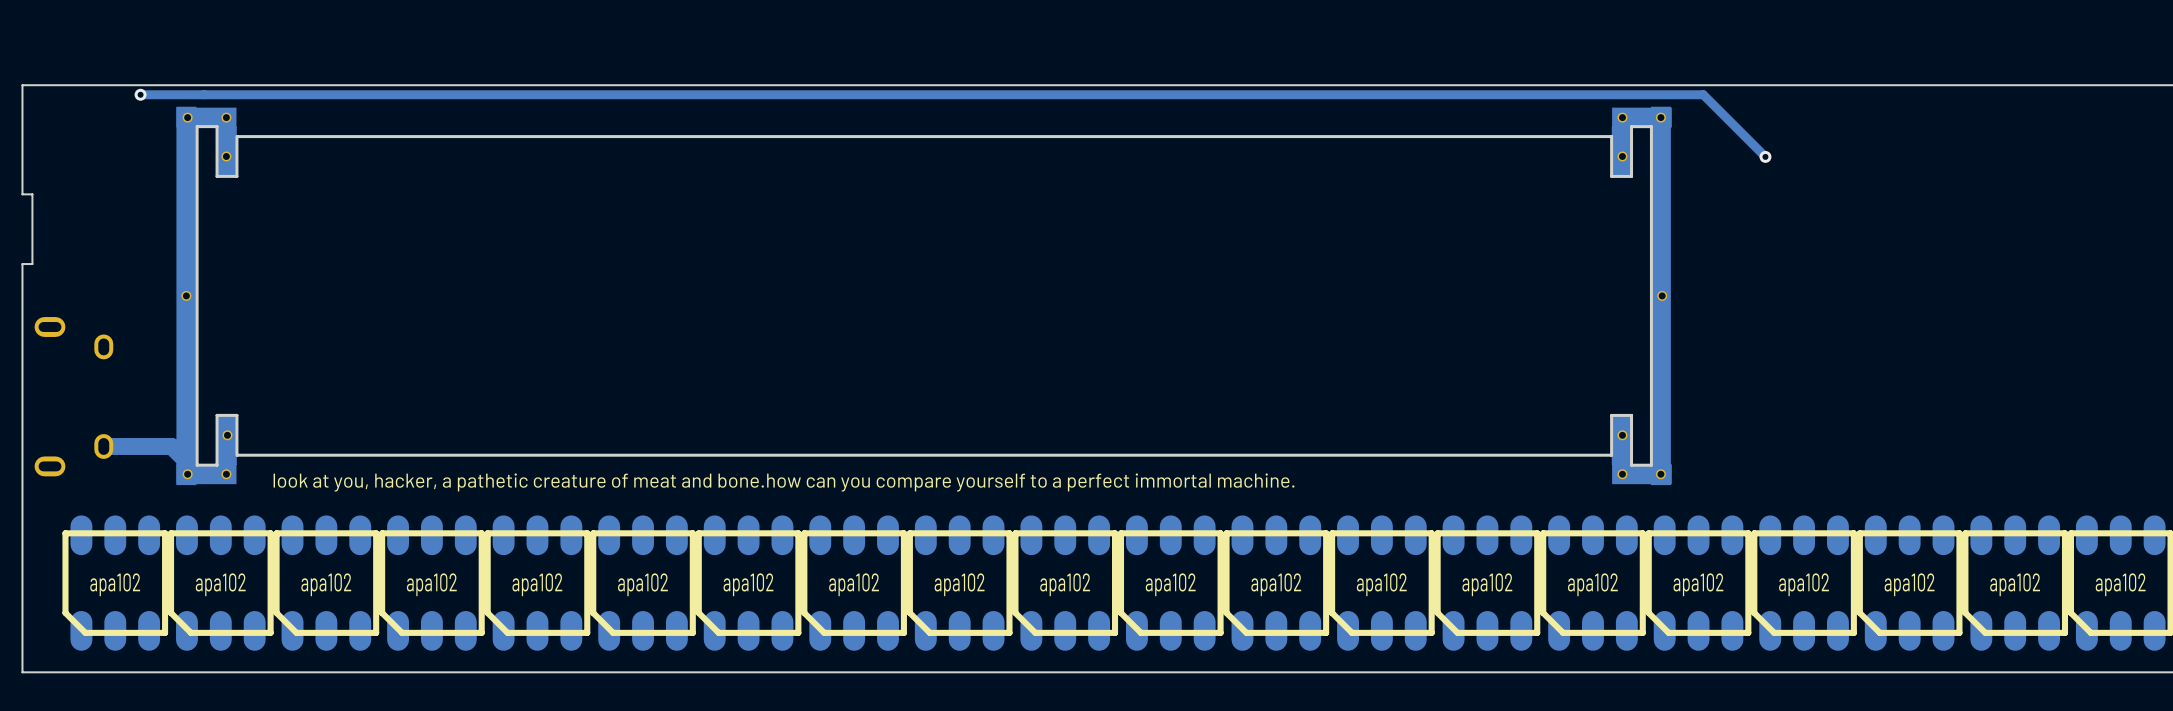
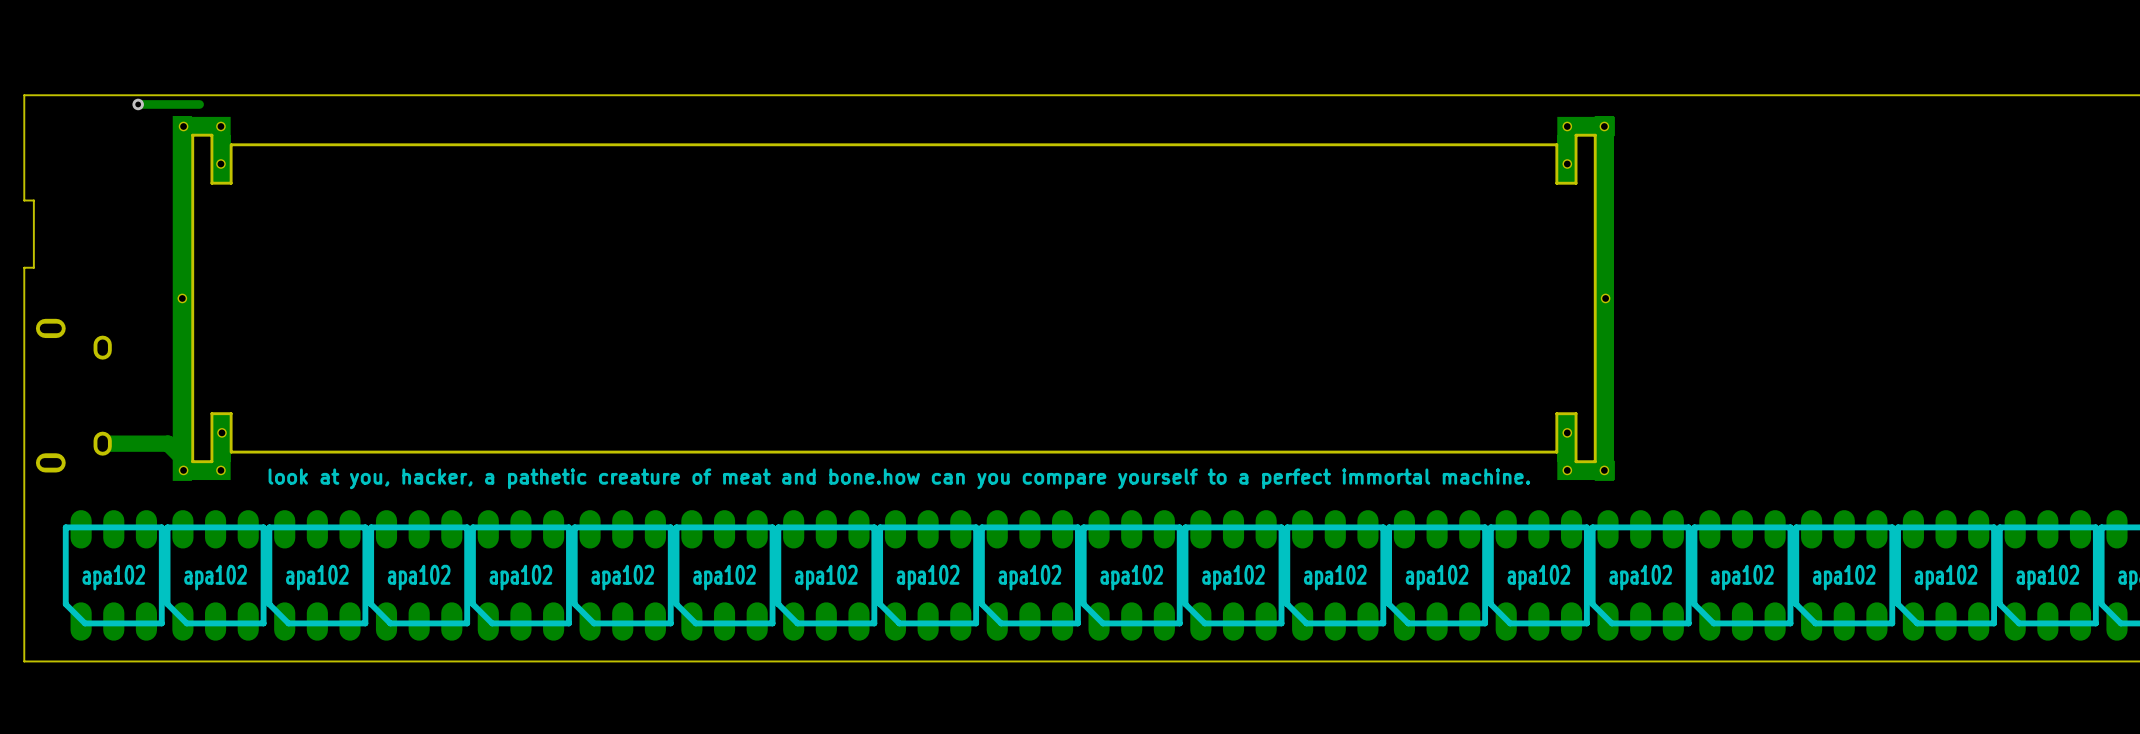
track: (204, 94) (1703, 94) (1765, 156) -> none
via: (1765, 156) -> none

